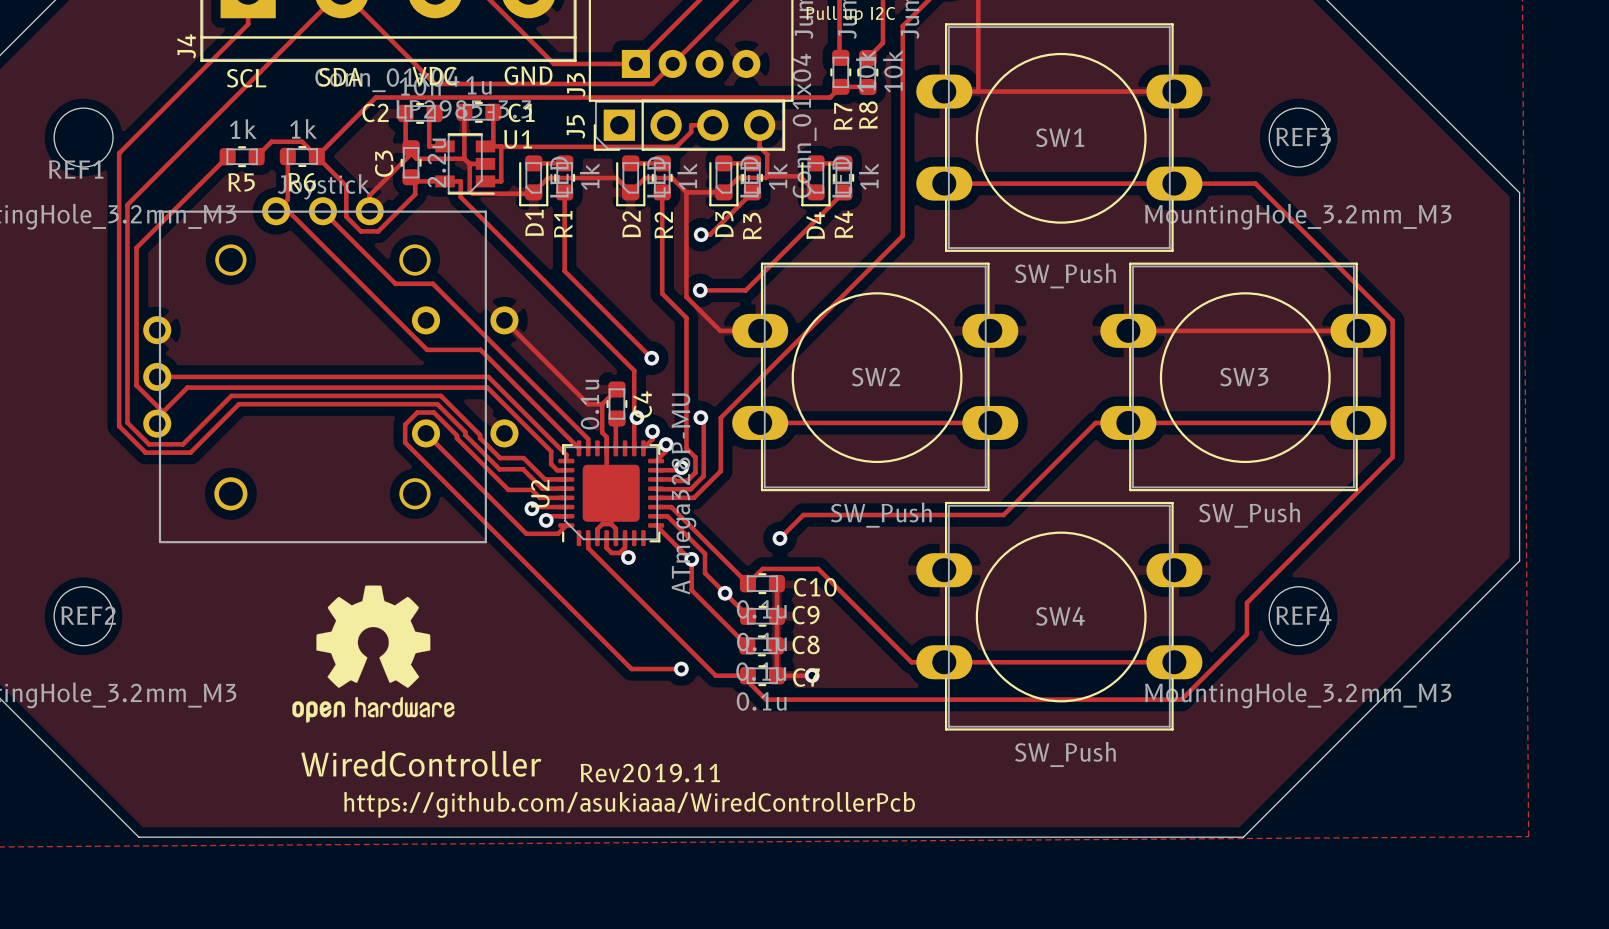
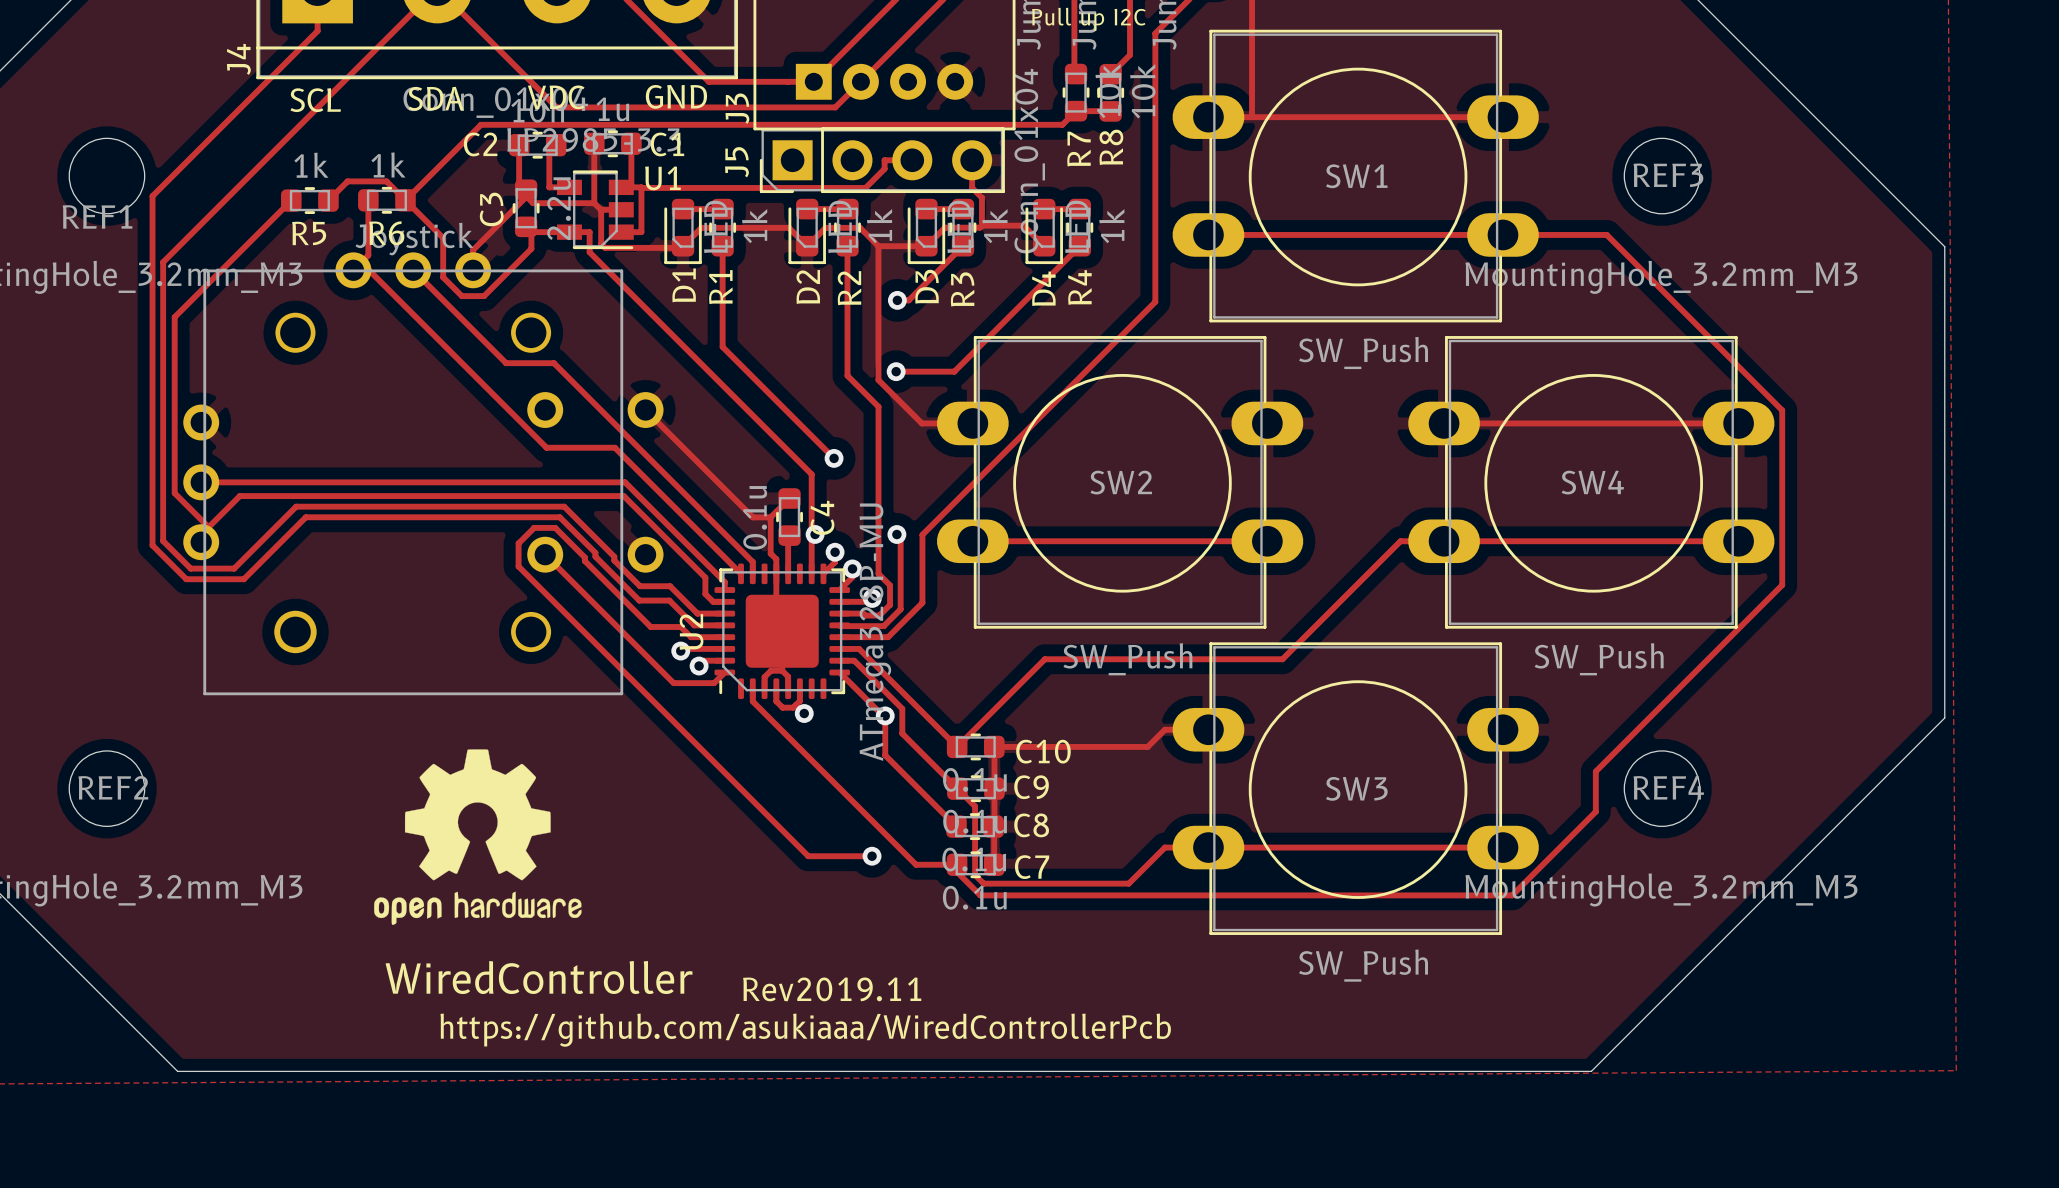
SW3 name: SW3 (1244, 377) -> SW4 (1592, 482)
track: (1095, 422) (1003, 514) (803, 514) (779, 538) -> (1402, 541) (1282, 659) (1044, 659) (976, 728)
via: (779, 538) -> none
track: (762, 568) (818, 568) (911, 662) -> (957, 788) (975, 806) (975, 875) (983, 883) (1128, 883) (1166, 847)
track: none -> (1208, 729) (1164, 729) (1147, 746) (994, 746)
via: (725, 593) -> none
SW4 name: SW4 (1060, 616) -> SW3 (1356, 788)
track: (776, 675) (812, 675) -> none
via: (812, 675) -> none

